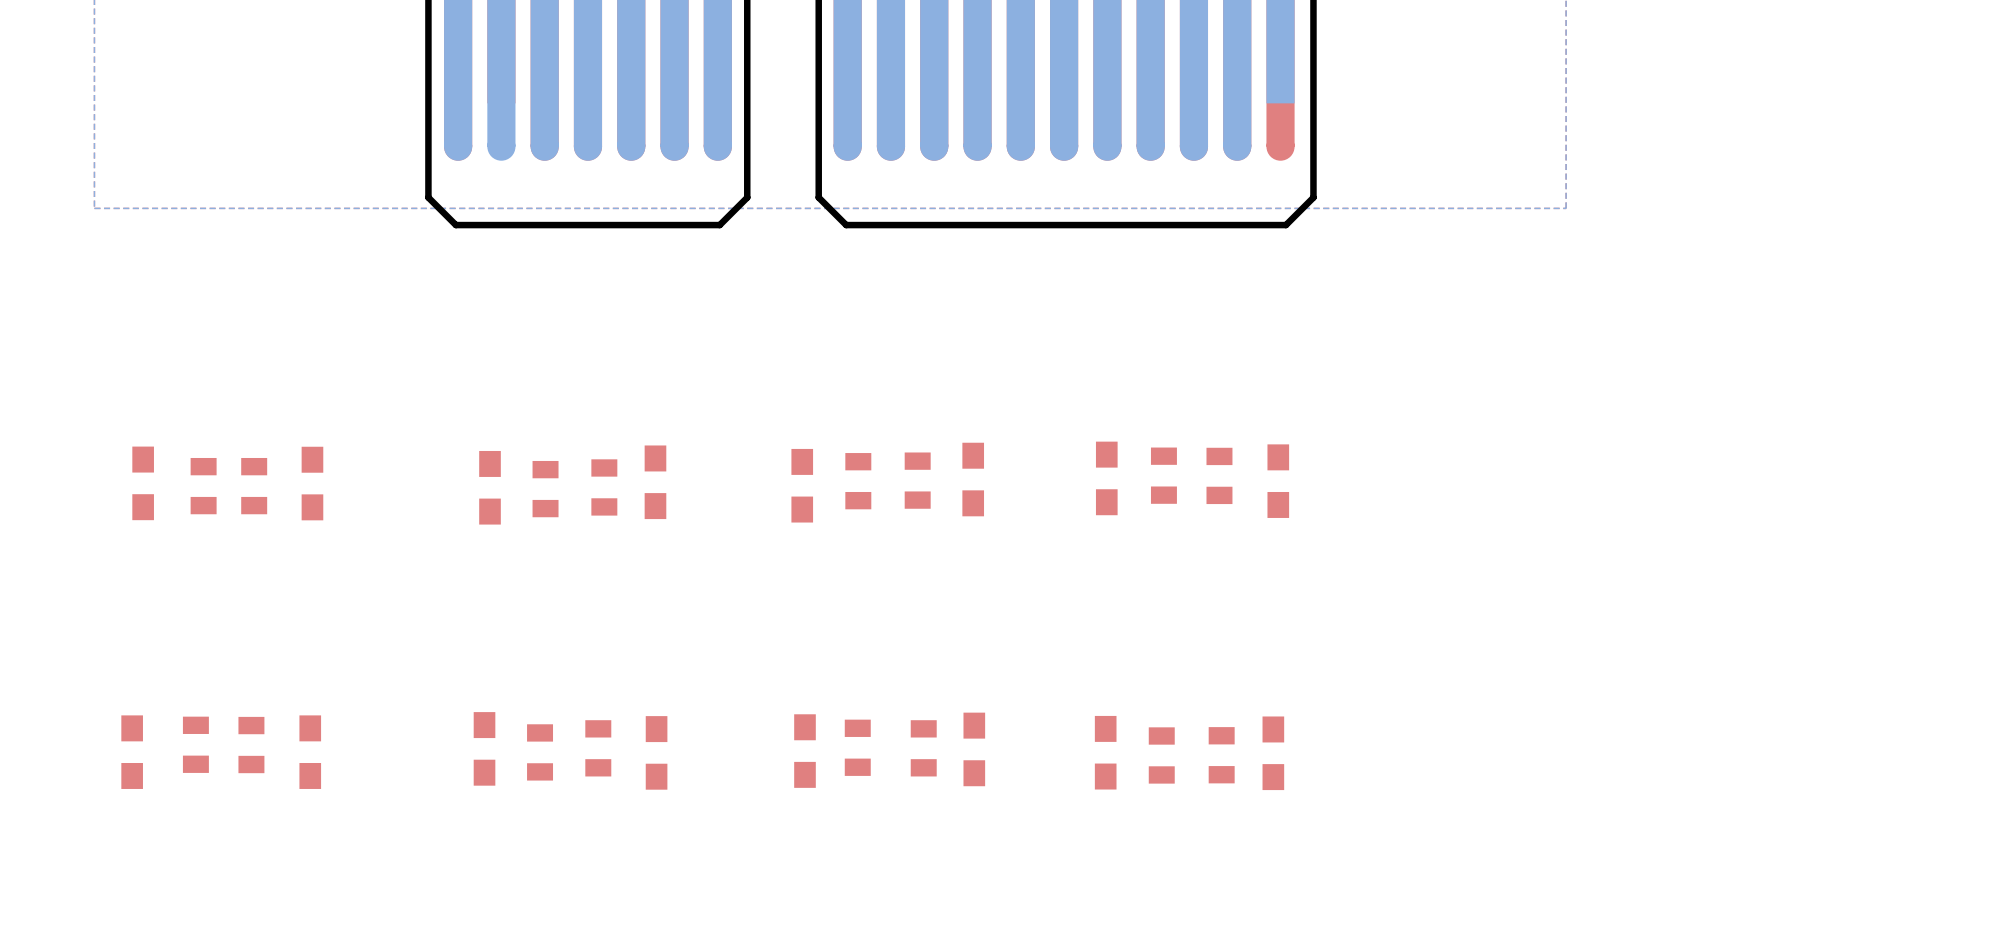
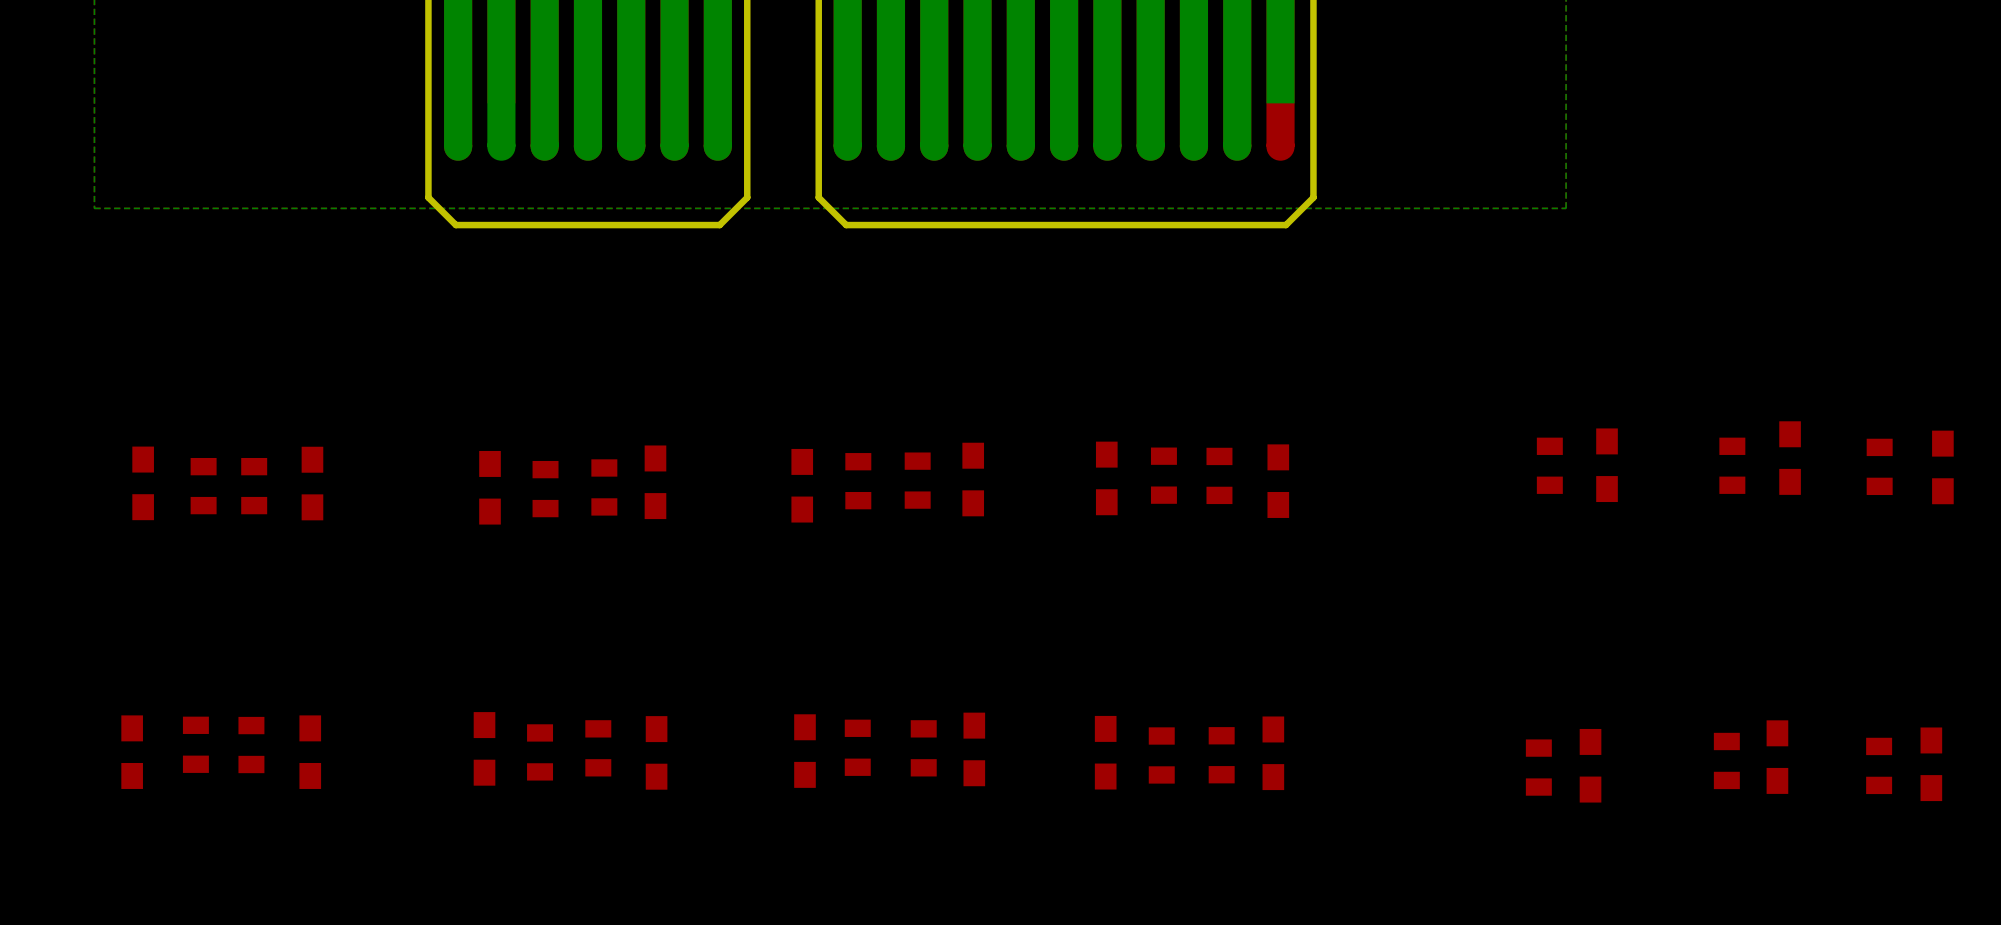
part: none -> (1790, 458)
part: none -> (1549, 465)
part: none -> (1607, 465)
part: none -> (1732, 465)
part: none -> (1879, 466)
part: none -> (1942, 467)
part: none -> (1777, 757)
part: none -> (1726, 760)
part: none -> (1931, 764)
part: none -> (1590, 765)
part: none -> (1879, 765)
part: none -> (1538, 767)

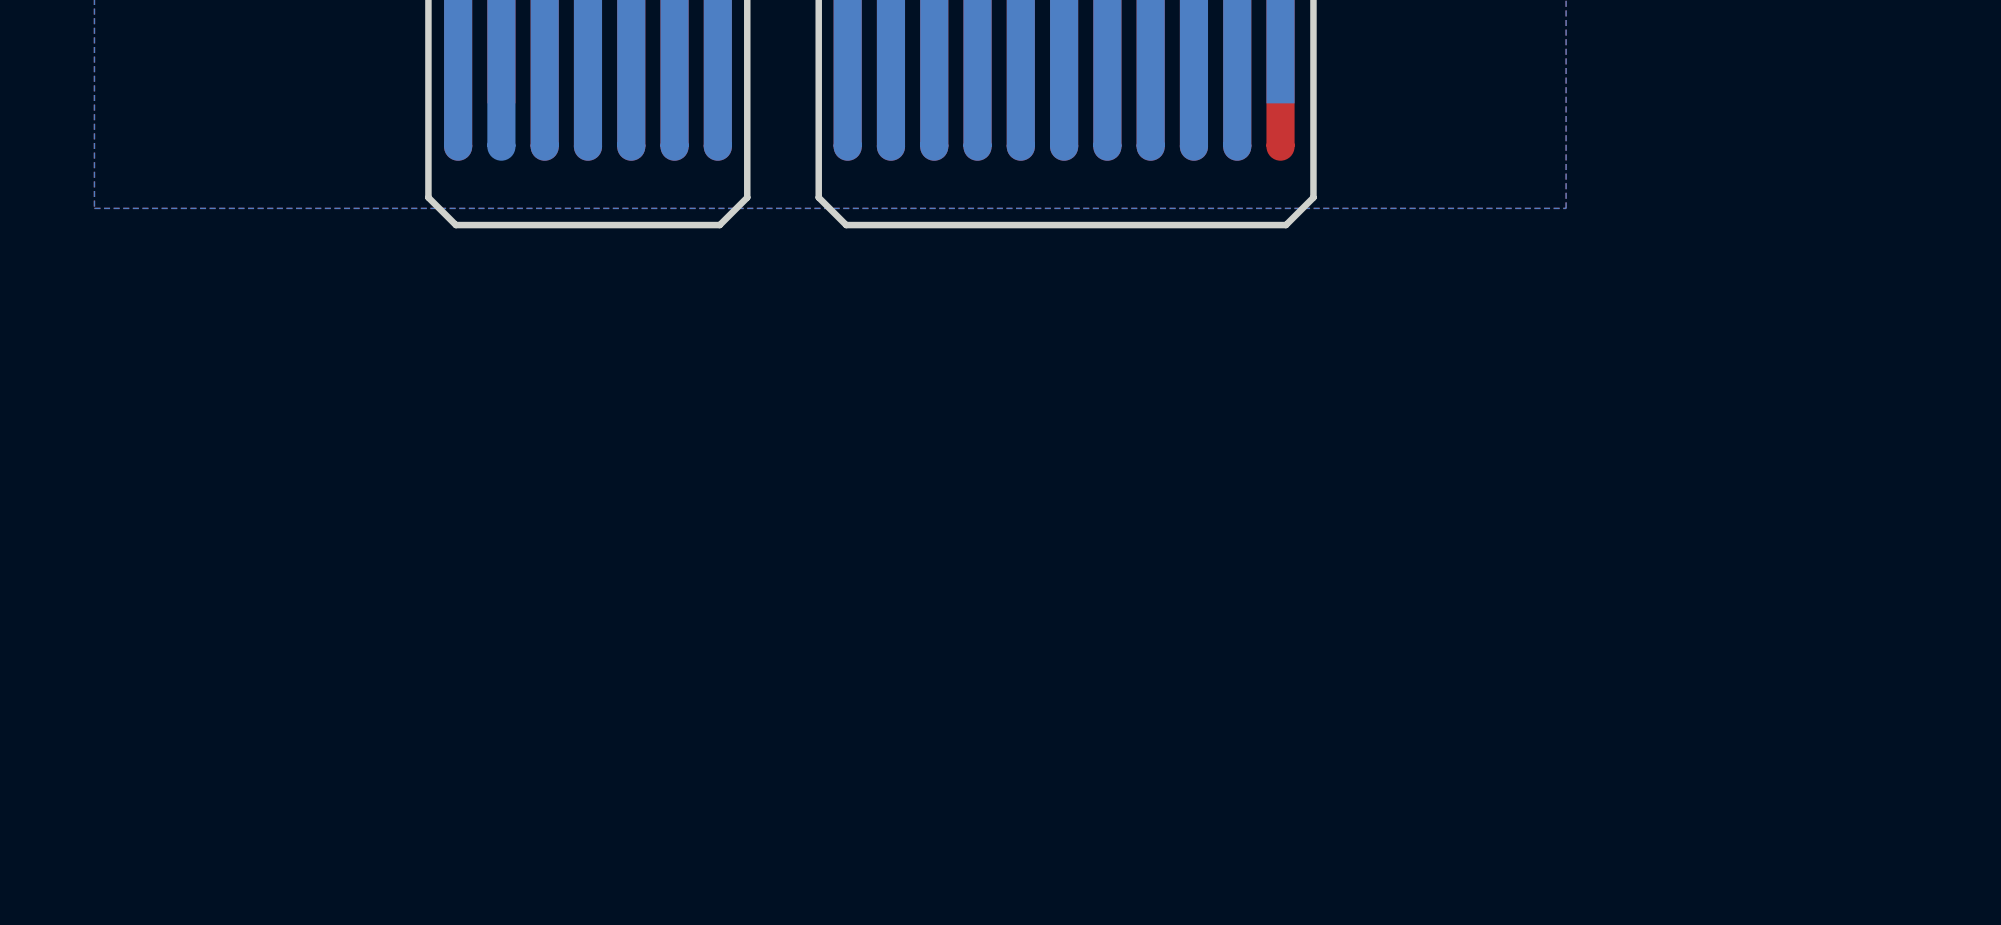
part: (1790, 458) -> none
part: (1549, 465) -> none
part: (1607, 465) -> none
part: (1732, 465) -> none
part: (1879, 466) -> none
part: (1942, 467) -> none
part: (1163, 475) -> none
part: (1219, 475) -> none
part: (1106, 478) -> none
part: (973, 479) -> none
part: (917, 480) -> none
part: (858, 481) -> none
part: (1278, 481) -> none
part: (655, 482) -> none
part: (143, 483) -> none
part: (312, 483) -> none
part: (802, 485) -> none
part: (203, 486) -> none
part: (254, 486) -> none
part: (490, 487) -> none
part: (604, 487) -> none
part: (545, 489) -> none
part: (195, 744) -> none
part: (251, 745) -> none
part: (857, 747) -> none
part: (484, 748) -> none
part: (598, 748) -> none
part: (923, 748) -> none
part: (974, 749) -> none
part: (804, 751) -> none
part: (132, 752) -> none
part: (310, 752) -> none
part: (540, 752) -> none
part: (656, 752) -> none
part: (1105, 752) -> none
part: (1273, 753) -> none
part: (1161, 755) -> none
part: (1221, 755) -> none
part: (1777, 757) -> none
part: (1726, 760) -> none
part: (1931, 764) -> none
part: (1590, 765) -> none
part: (1879, 765) -> none
part: (1538, 767) -> none

